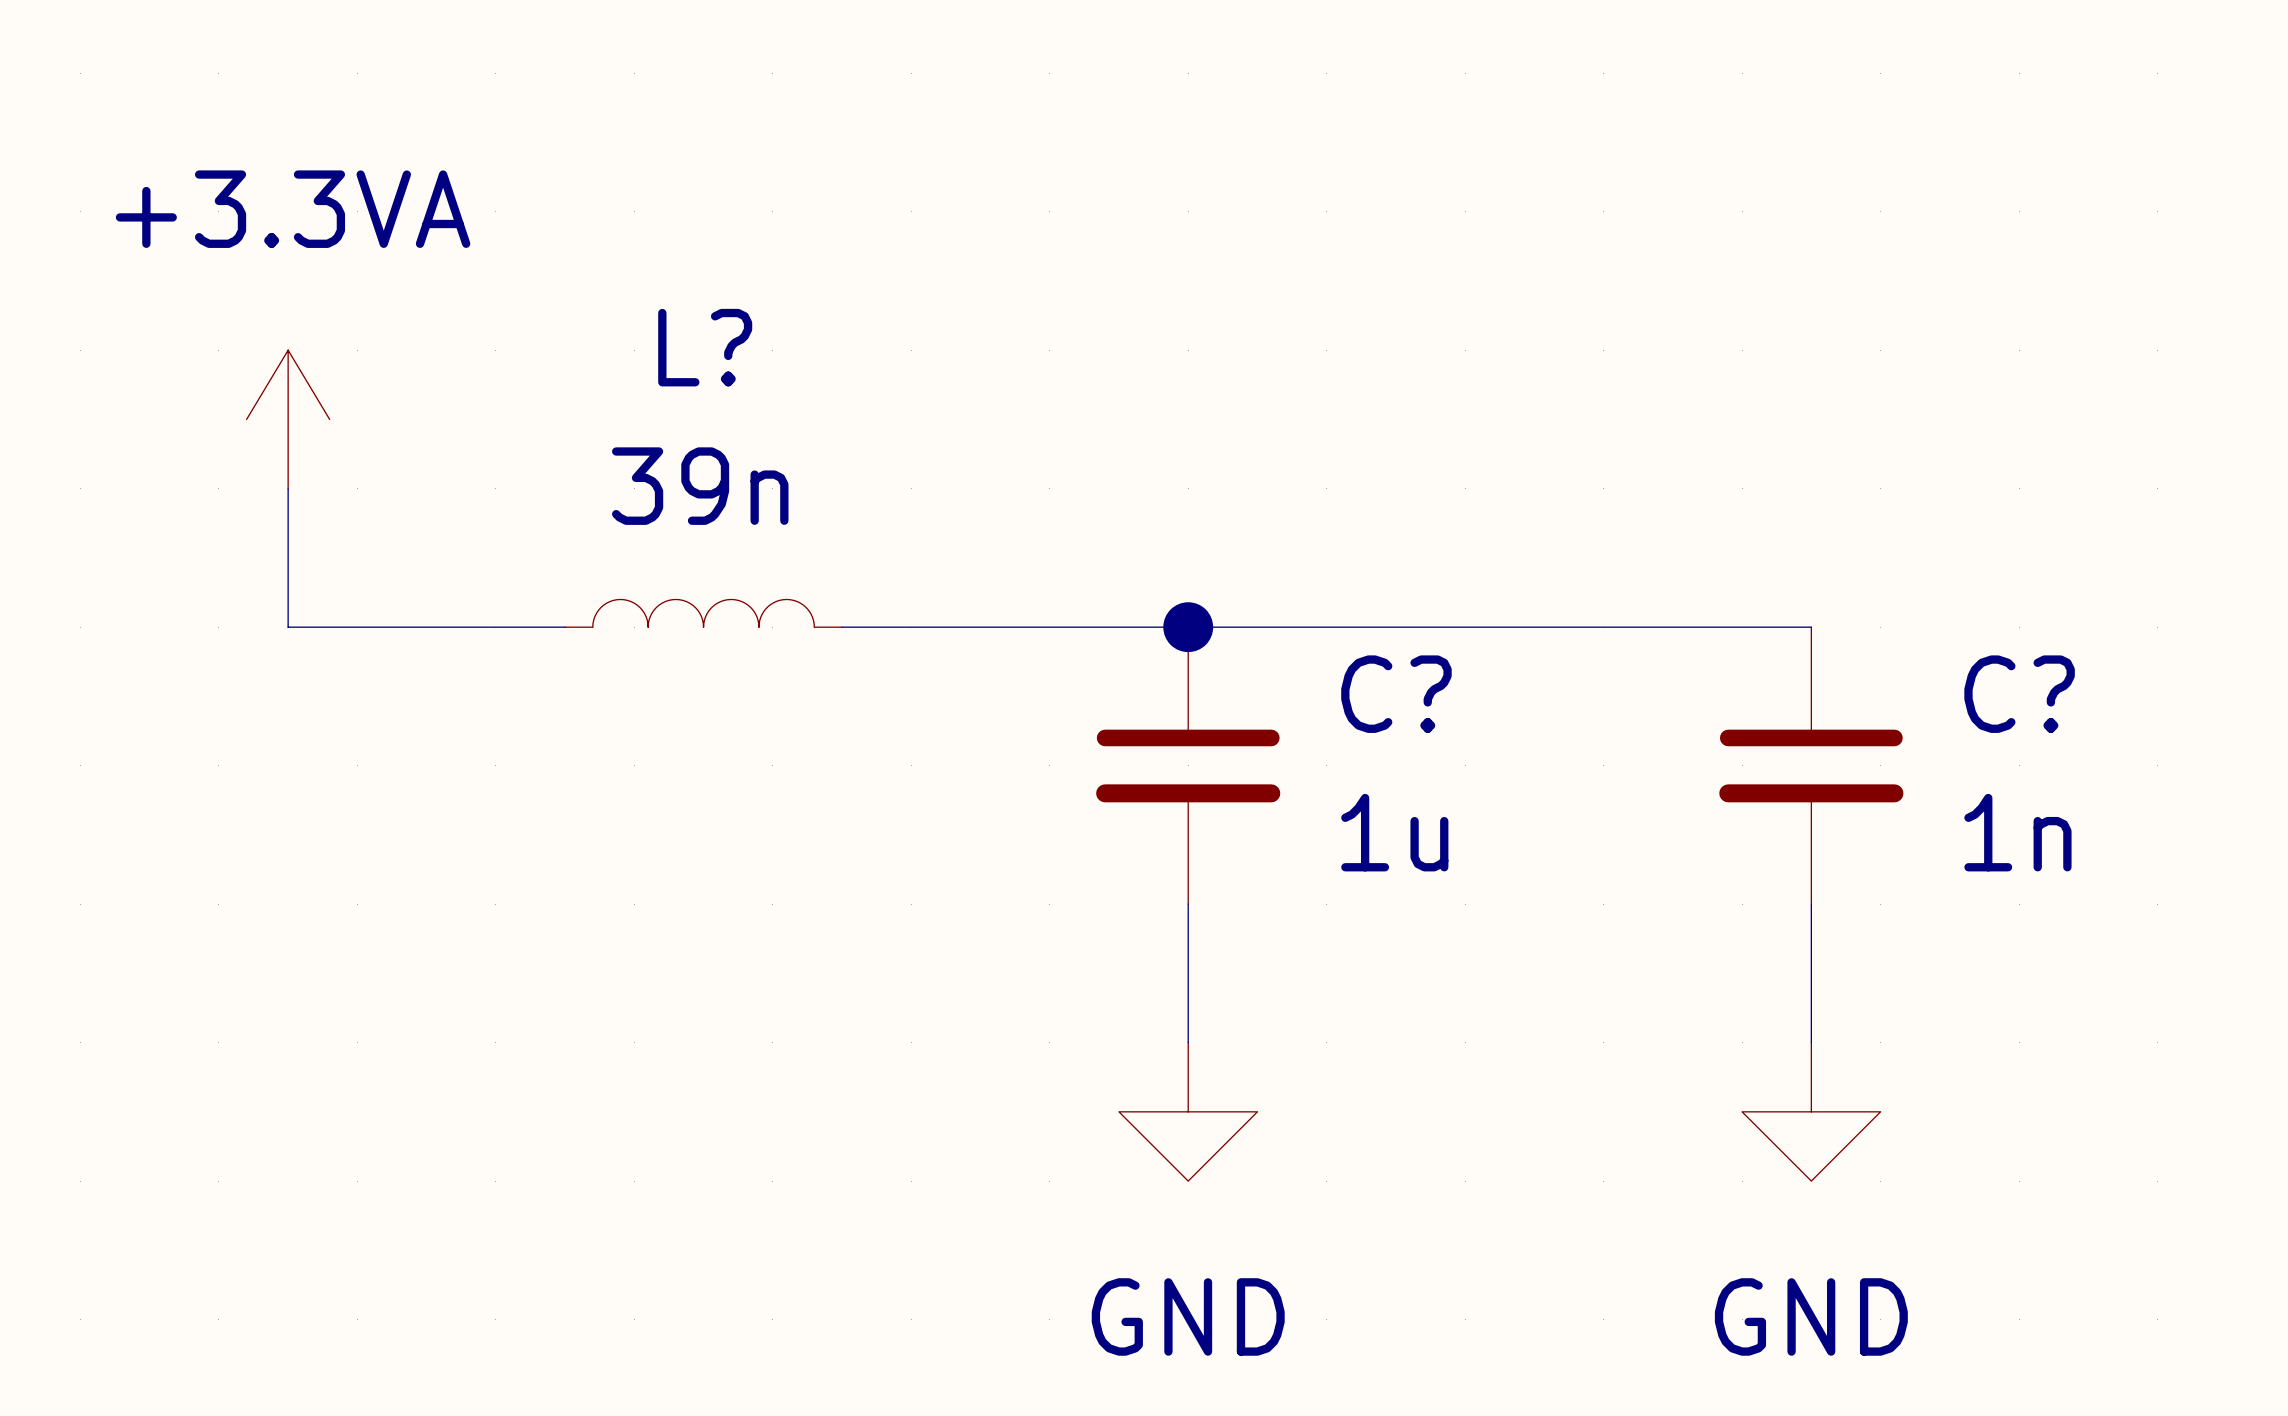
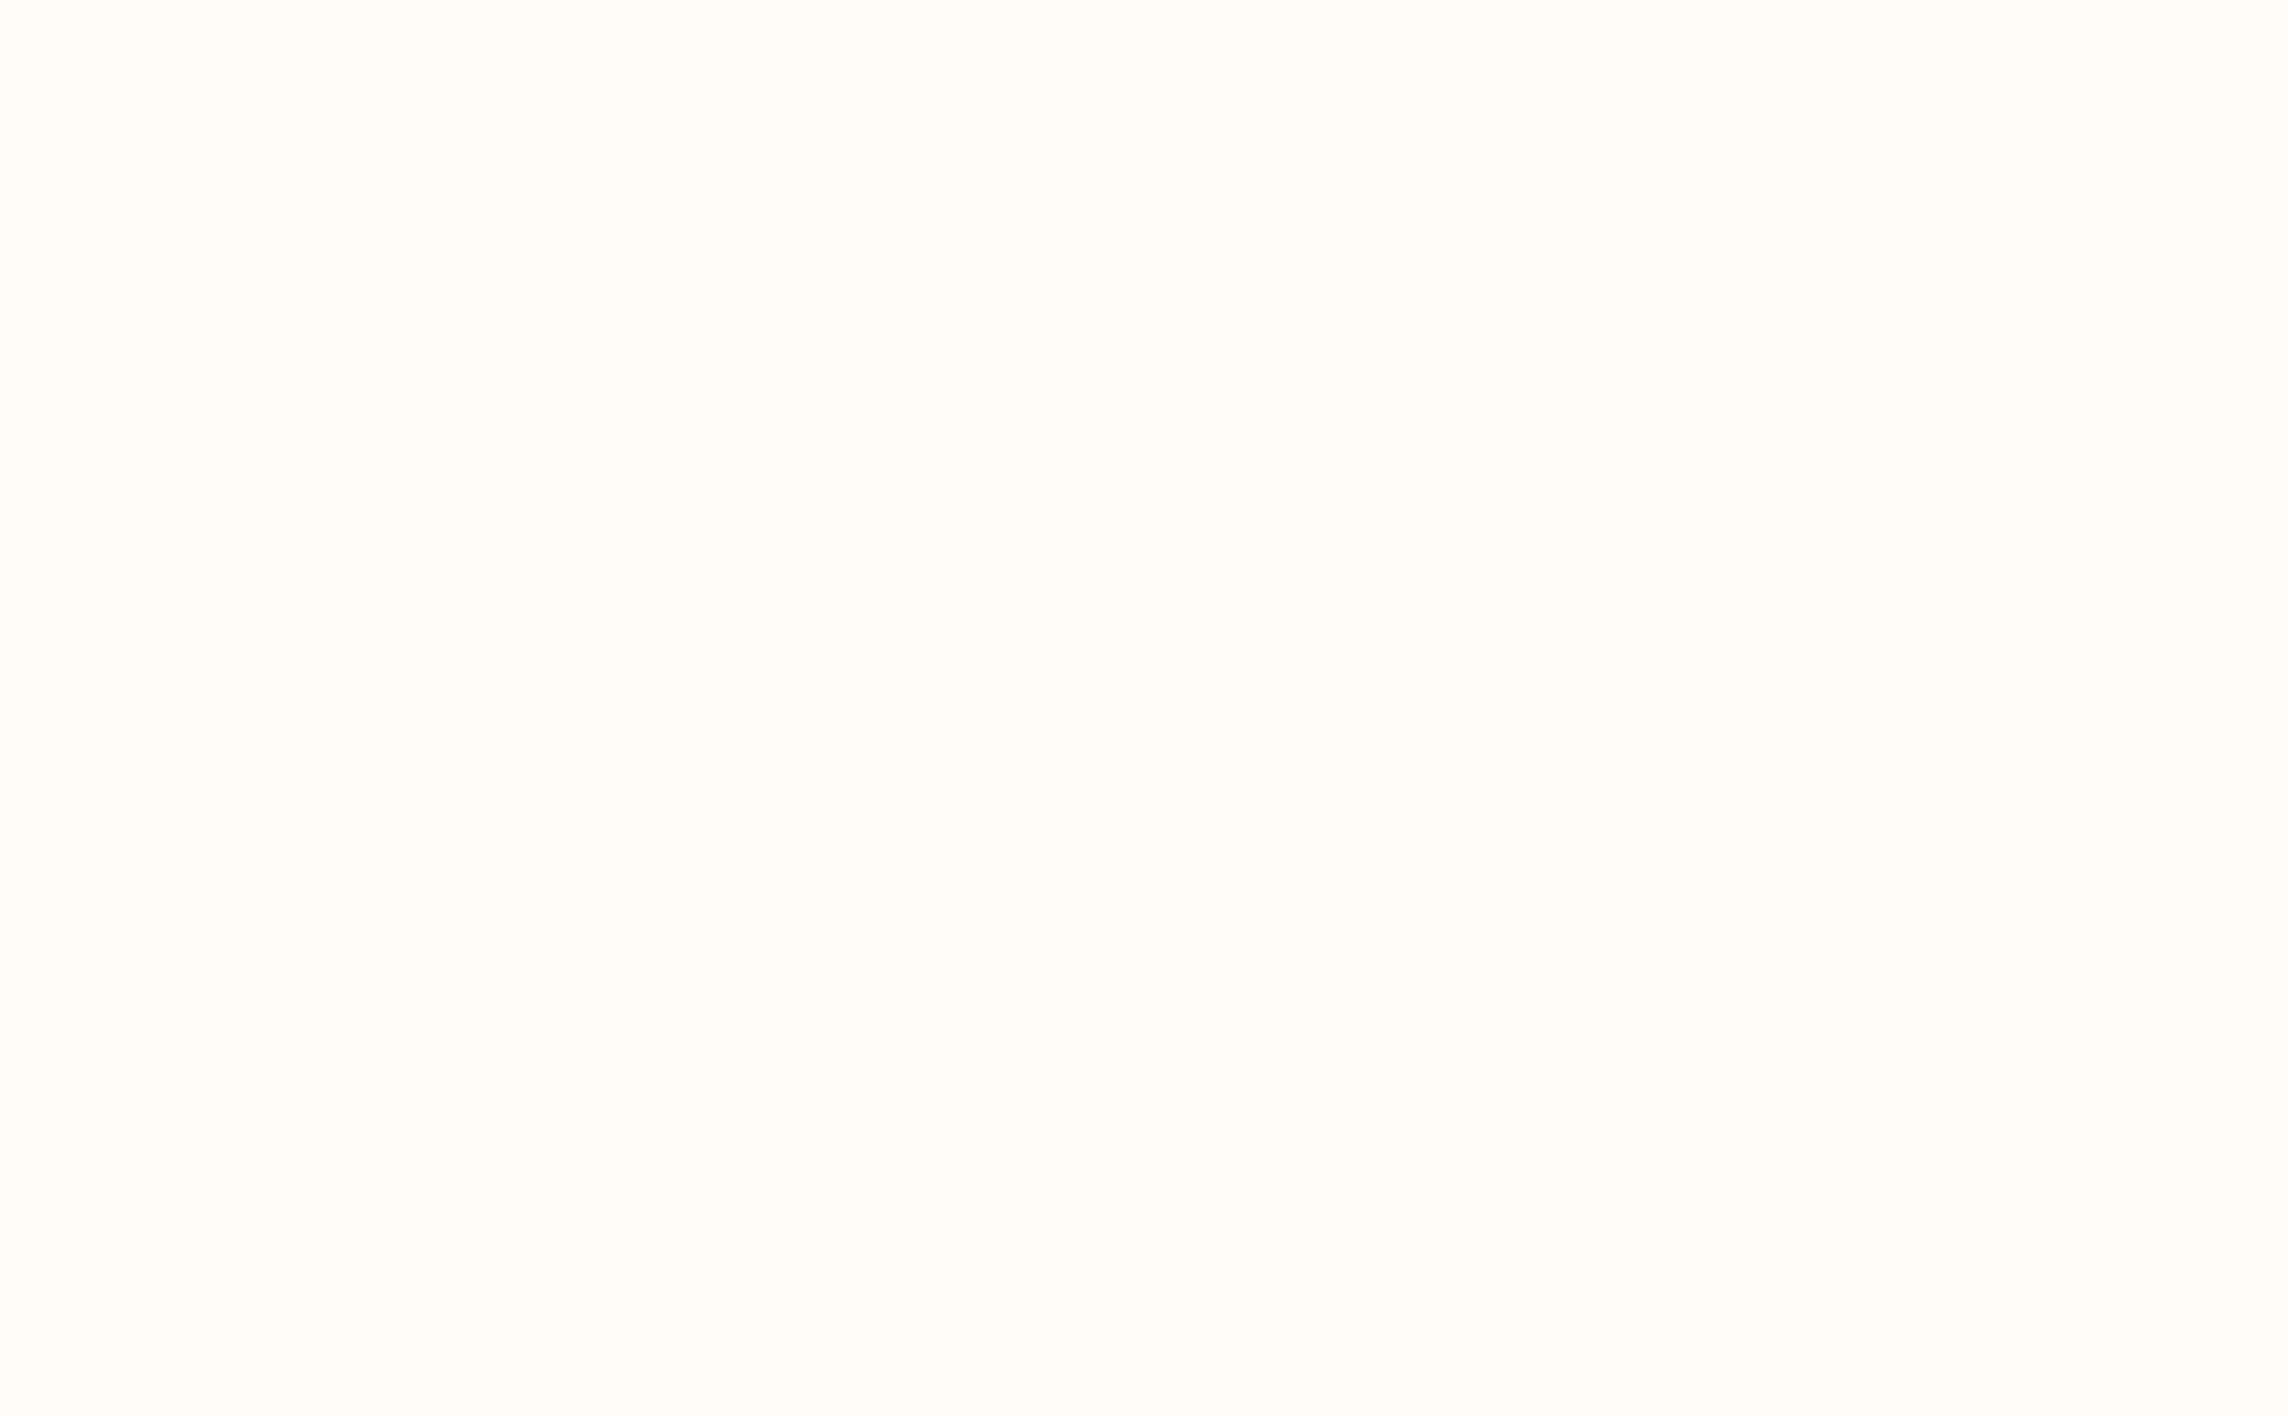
power symbol: +3.3VA (288, 419) -> none
wire: (288, 488) (288, 627) (565, 627) -> none
L?: 39n (703, 613) -> none
wire: (842, 627) (1811, 627) -> none
junction: (1188, 627) -> none
C?: 1u (1188, 765) -> none
C?: 1n (1811, 765) -> none
wire: (1188, 904) (1188, 1042) -> none
wire: (1811, 904) (1811, 1042) -> none
power symbol: GND (1188, 1111) -> none
power symbol: GND (1811, 1111) -> none

